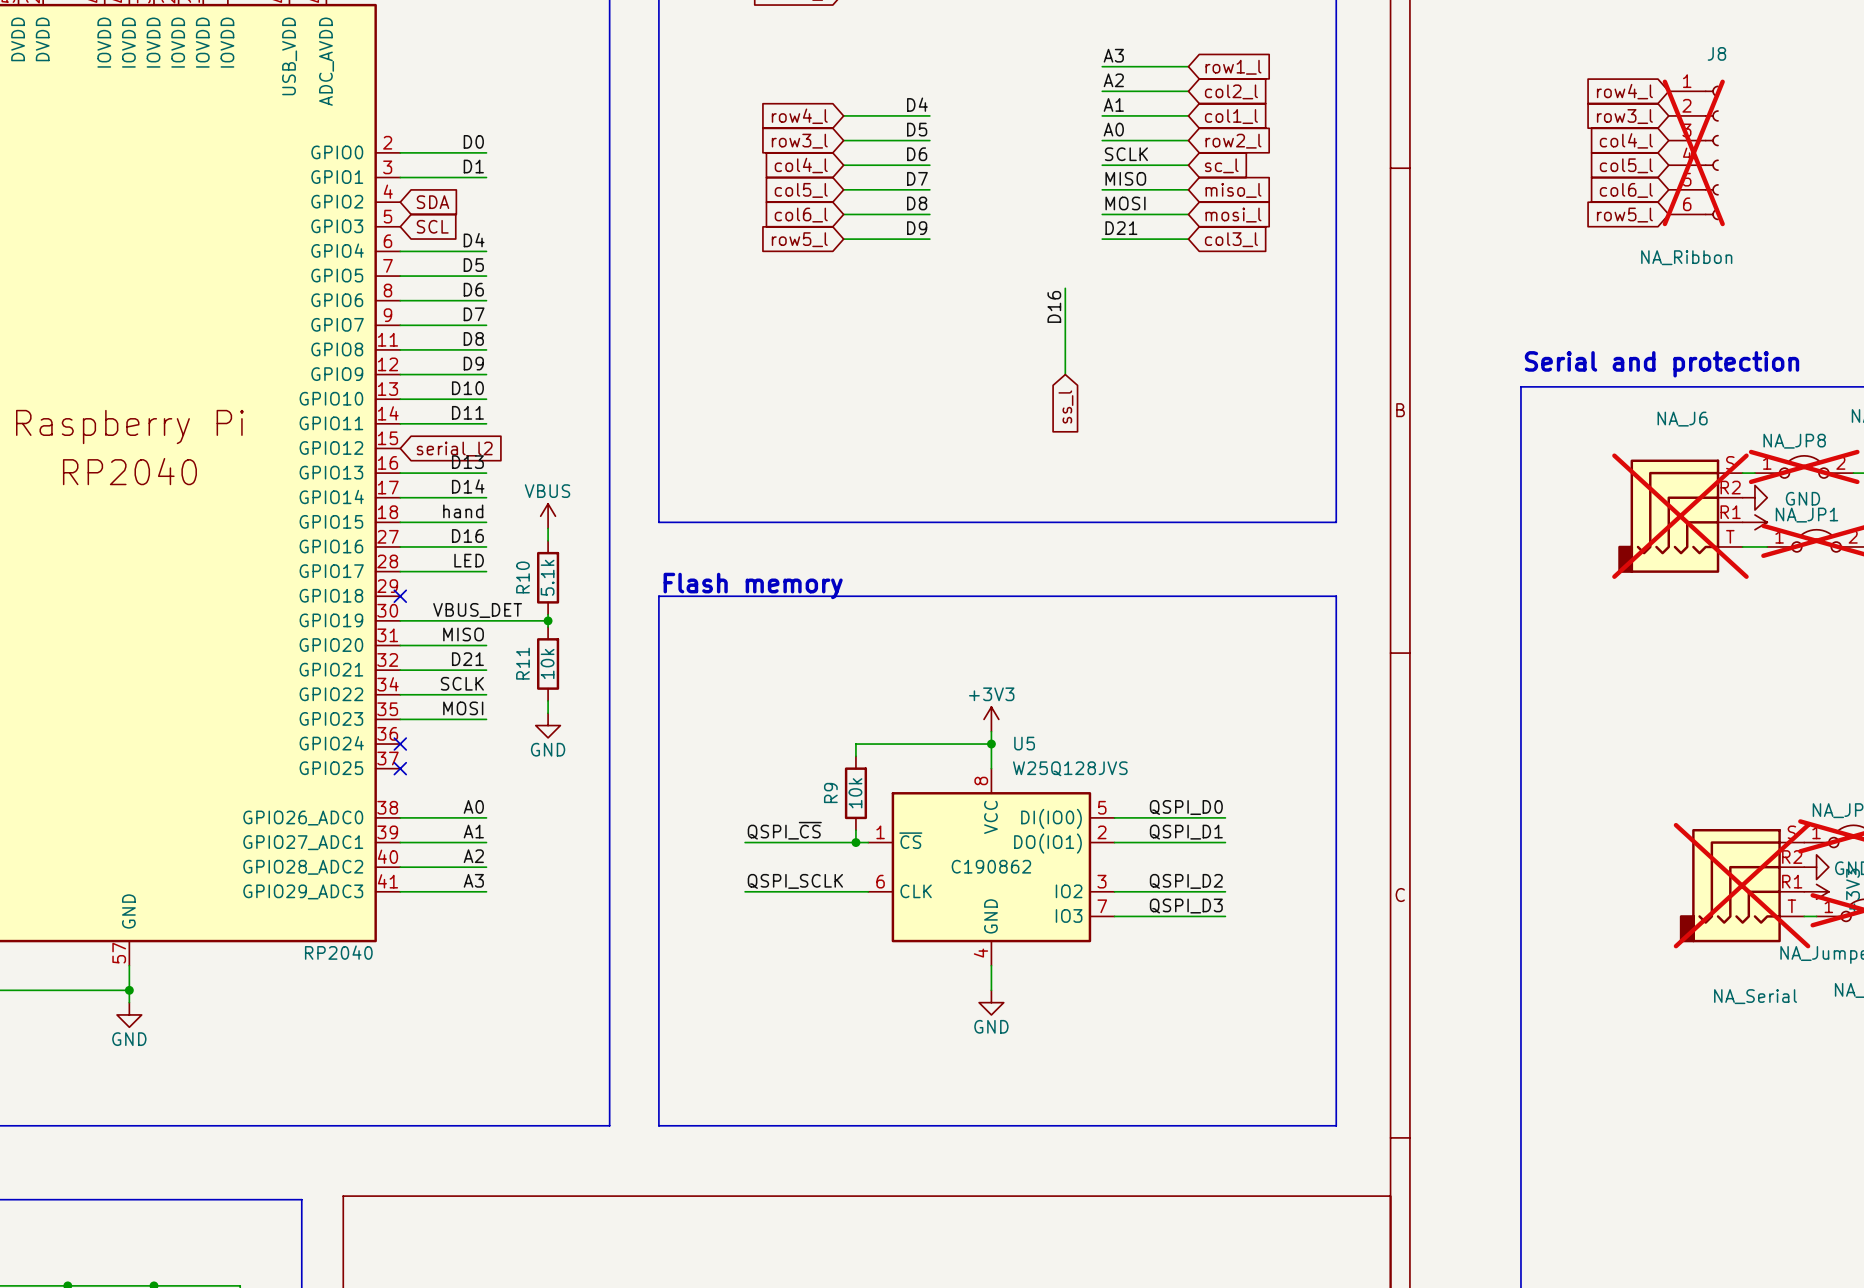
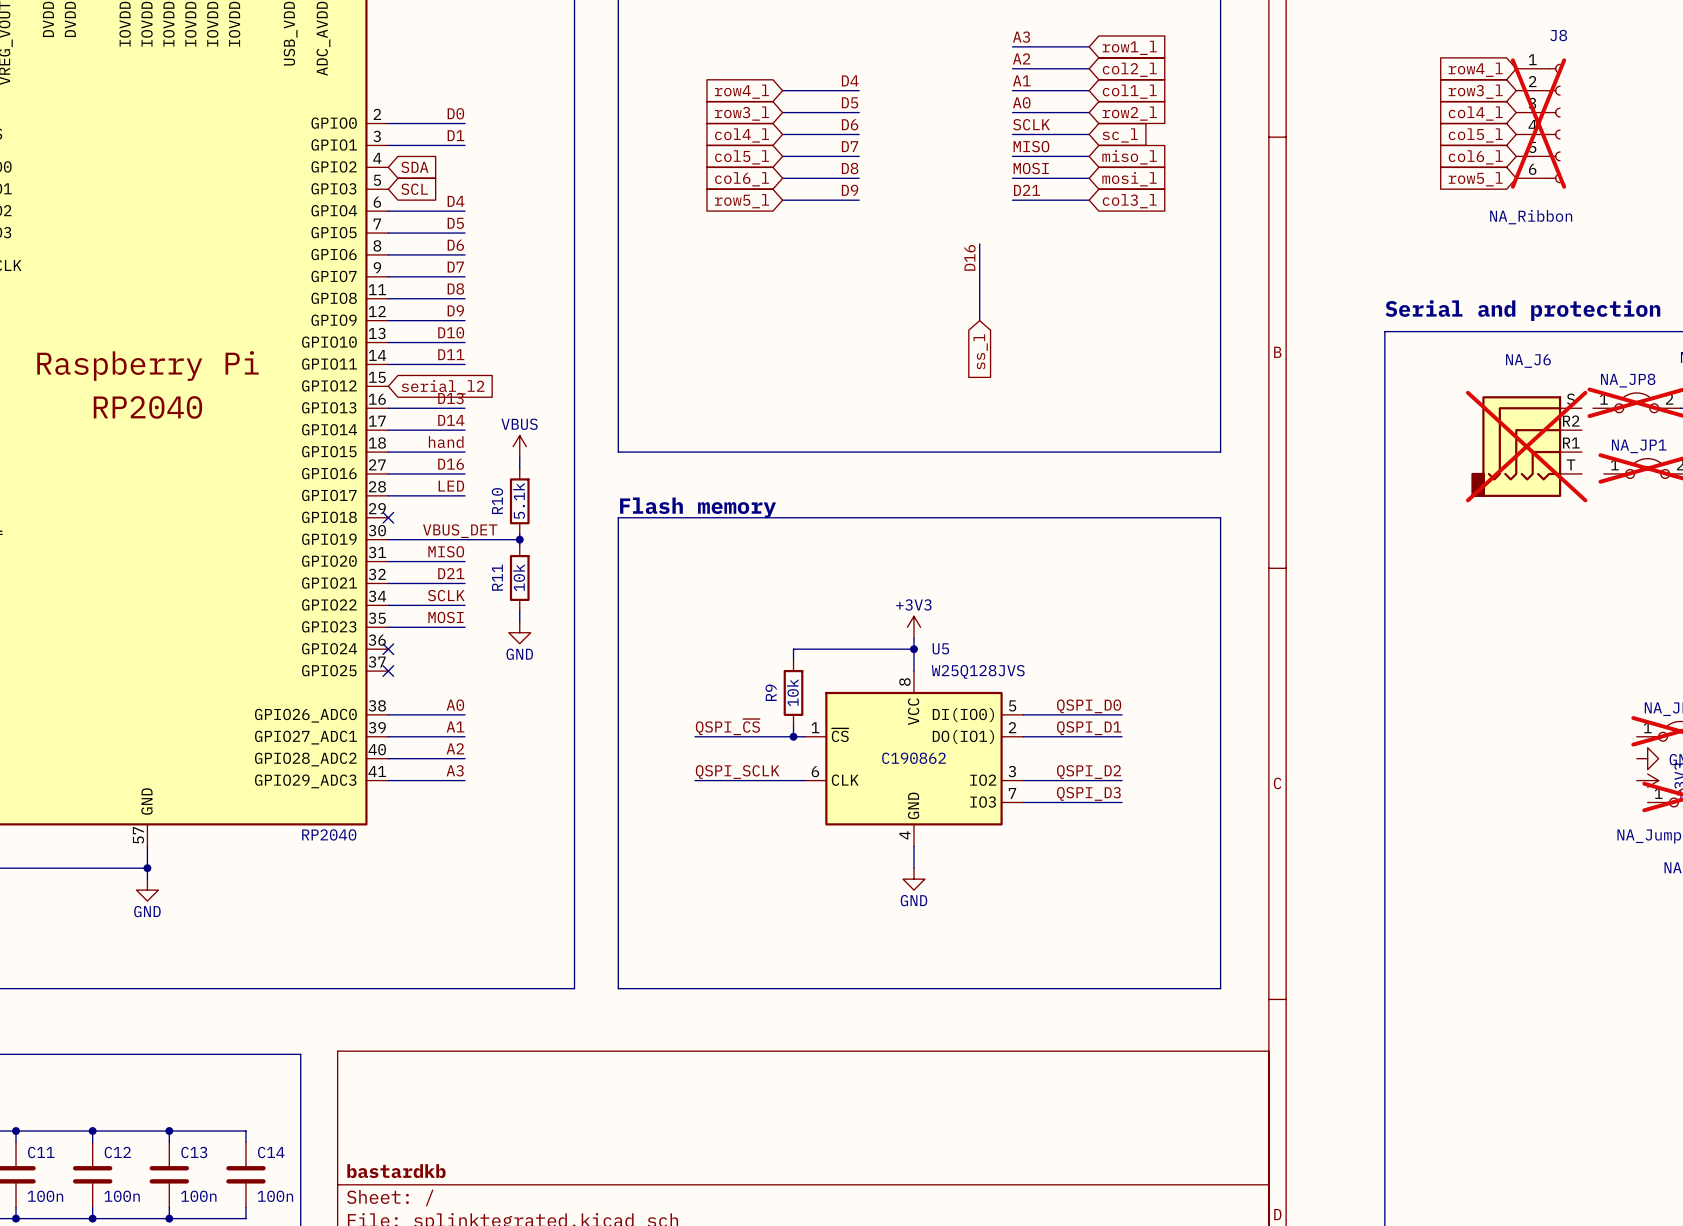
wire: (1742, 473) (1754, 473) -> none
power symbol: GND (1754, 497) -> none
power symbol: (1754, 522) -> none
wire: (1742, 546) (1767, 546) -> none
part: NA_Serial (1742, 885) -> none
wire: (1804, 916) (1816, 916) -> none

